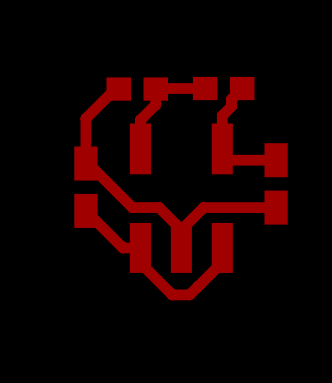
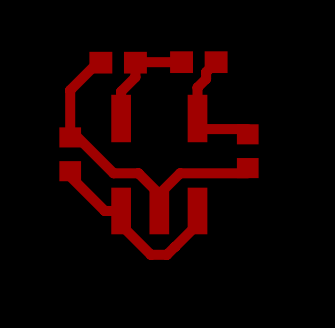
part footprint: [264, 143, 288, 225] -> [236, 124, 259, 179]
part footprint: [74, 146, 98, 228] -> [59, 127, 82, 182]

